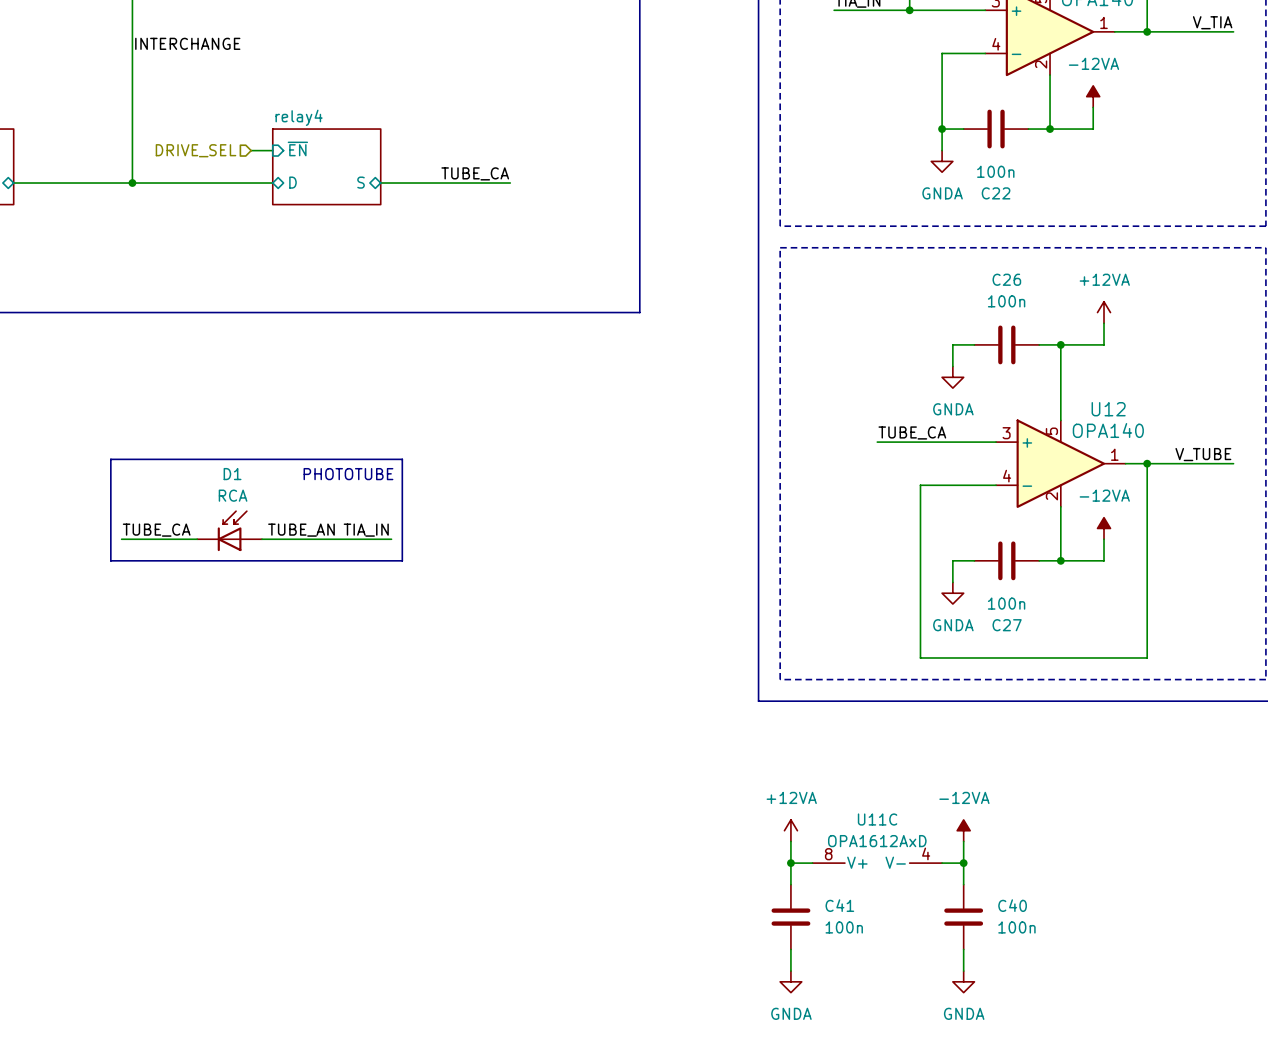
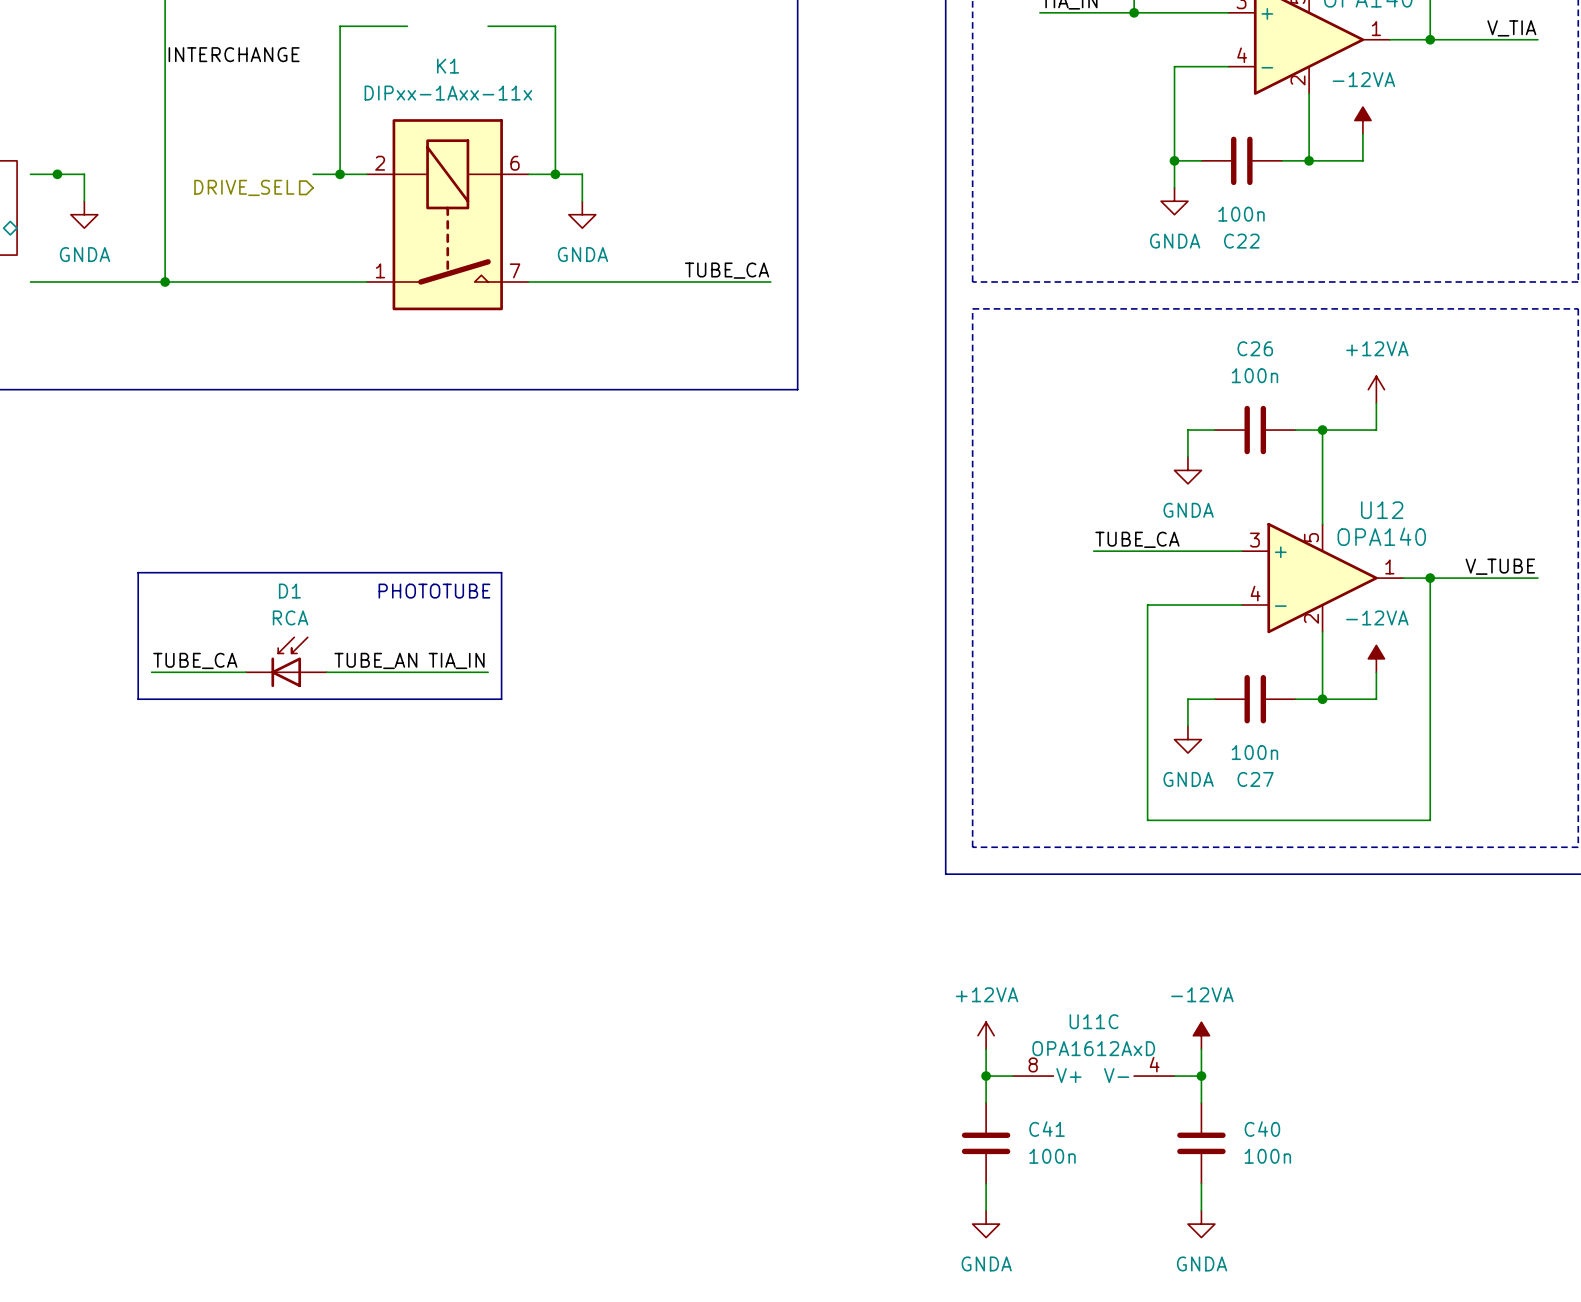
wire: none -> (407, 26) (340, 26) (340, 174)
wire: none -> (488, 26) (555, 26) (555, 174)
wire: none -> (30, 174) (84, 174) (84, 201)
junction: none -> (57, 174)
wire: none -> (313, 174) (366, 174)
junction: none -> (340, 174)
wire: none -> (528, 174) (582, 174) (582, 201)
junction: none -> (555, 174)
sheet pin: ~{EN} (297, 148) -> none
wire: (251, 150) (272, 150) -> none
sheet relay4: (326, 166) -> none
power symbol: none -> GNDA (84, 214)
K1: none -> DIPxx-1Axx-11x (447, 214)
power symbol: none -> GNDA (582, 214)
label position: TUBE_CA (475, 173) -> TUBE_CA (727, 270)
sheet pin: D (292, 182) -> none
sheet pin: S (361, 182) -> none
wire: (13, 183) (272, 183) -> none
wire: none -> (165, 228) (165, 281)
junction position: (132, 183) -> (165, 281)
wire: (380, 183) (510, 183) -> none
wire: none -> (30, 281) (366, 281)
wire: none -> (528, 281) (770, 281)

